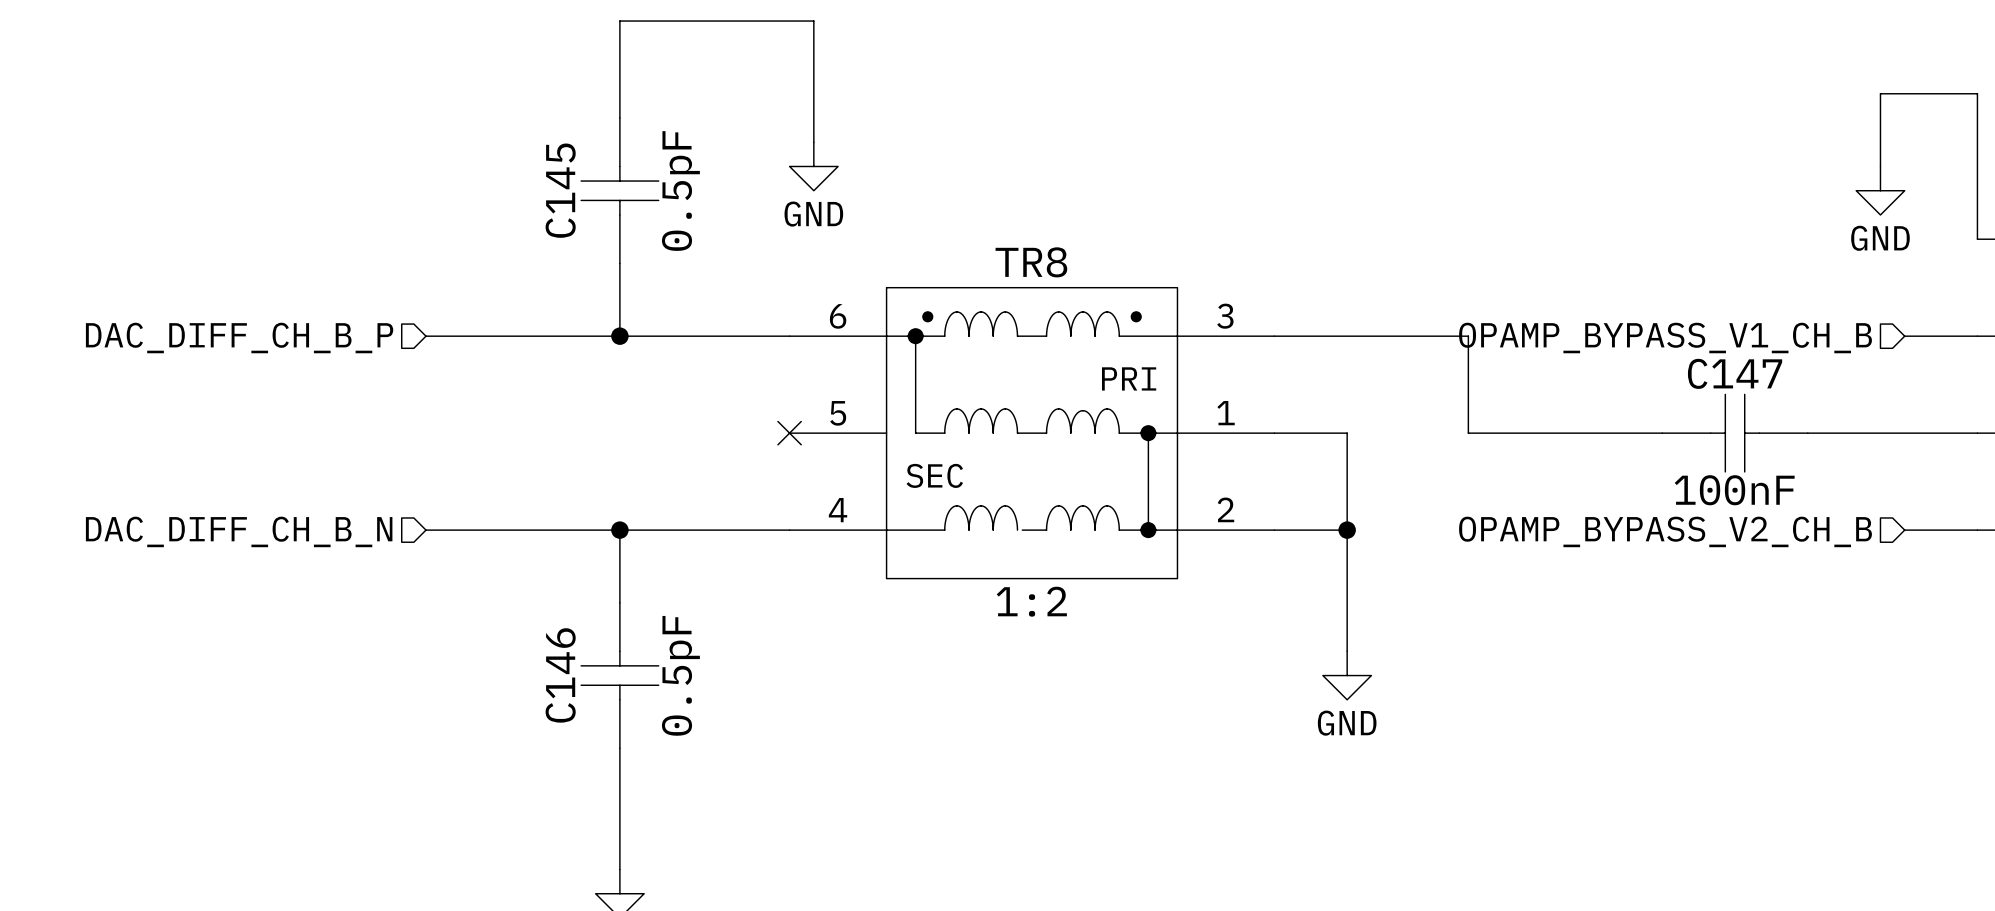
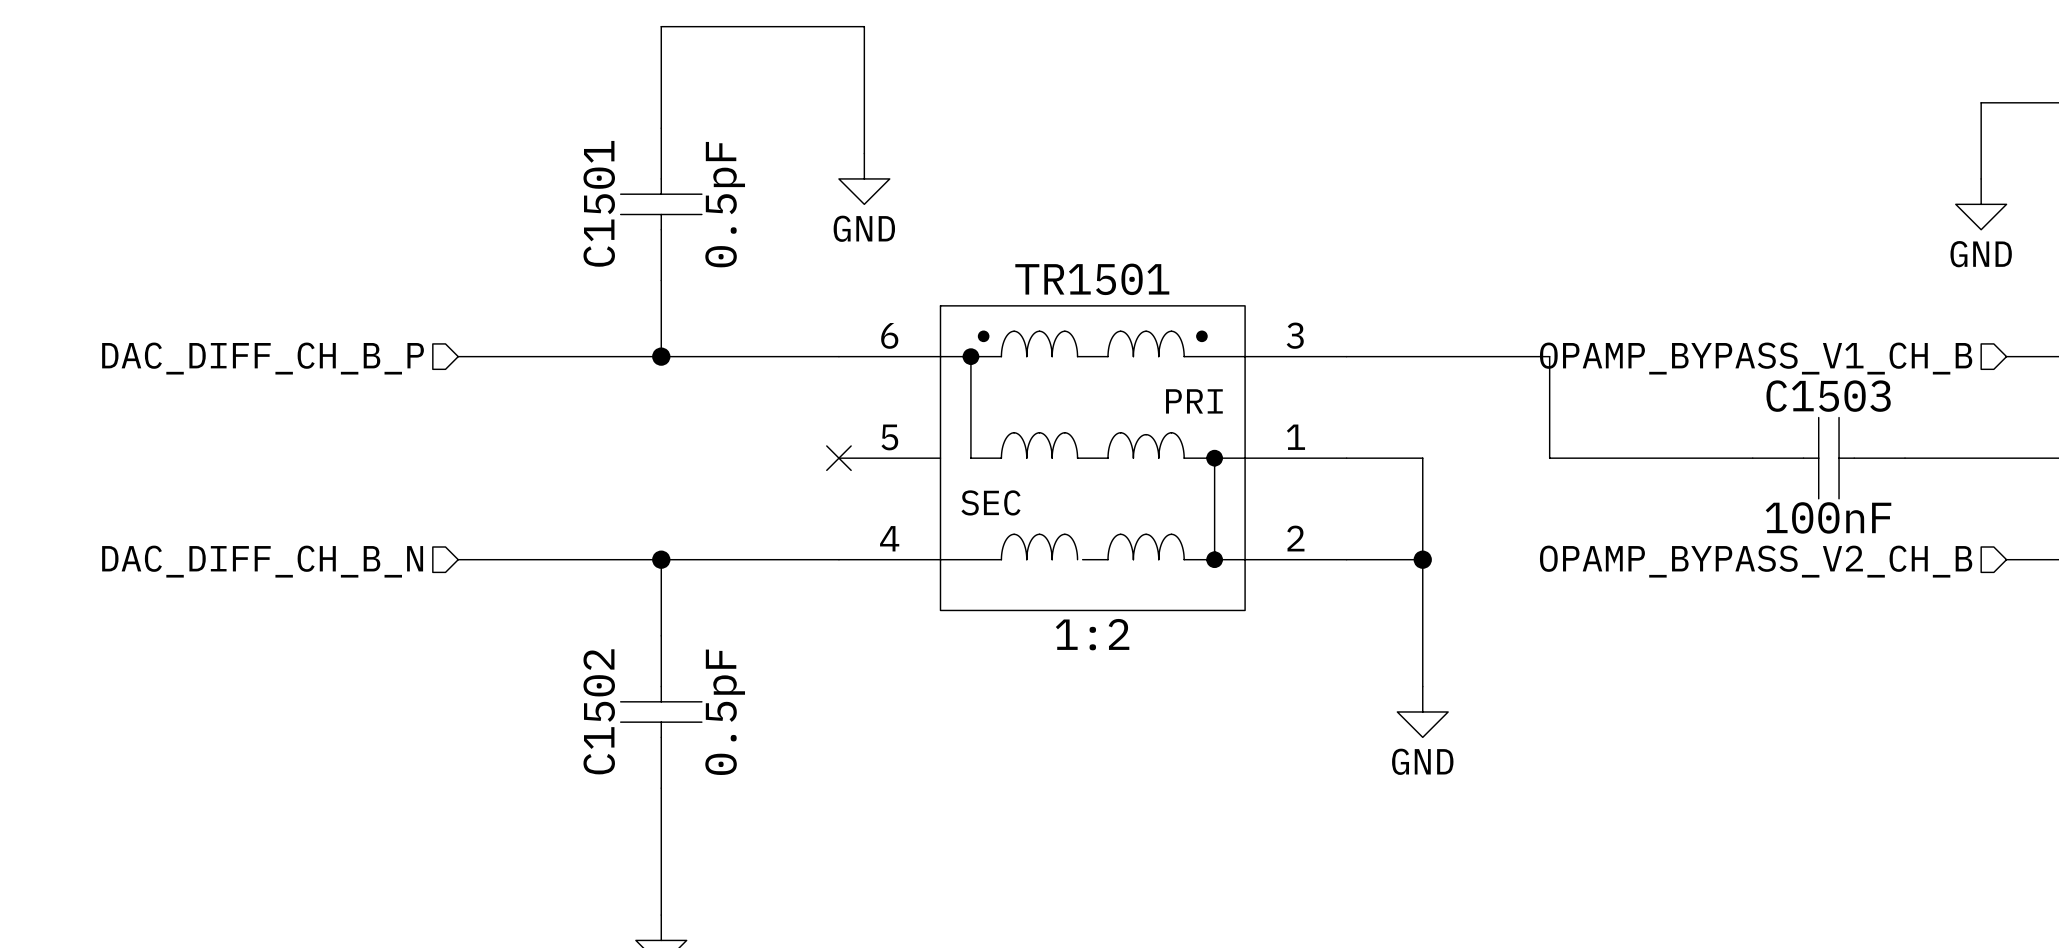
C145 name: C145 (560, 190) -> C1501 (599, 203)
TR8 name: TR8 (1031, 262) -> TR1501 (1092, 279)
C147 name: C147 (1735, 373) -> C1503 (1828, 396)
C146 name: C146 (560, 675) -> C1502 (599, 711)

